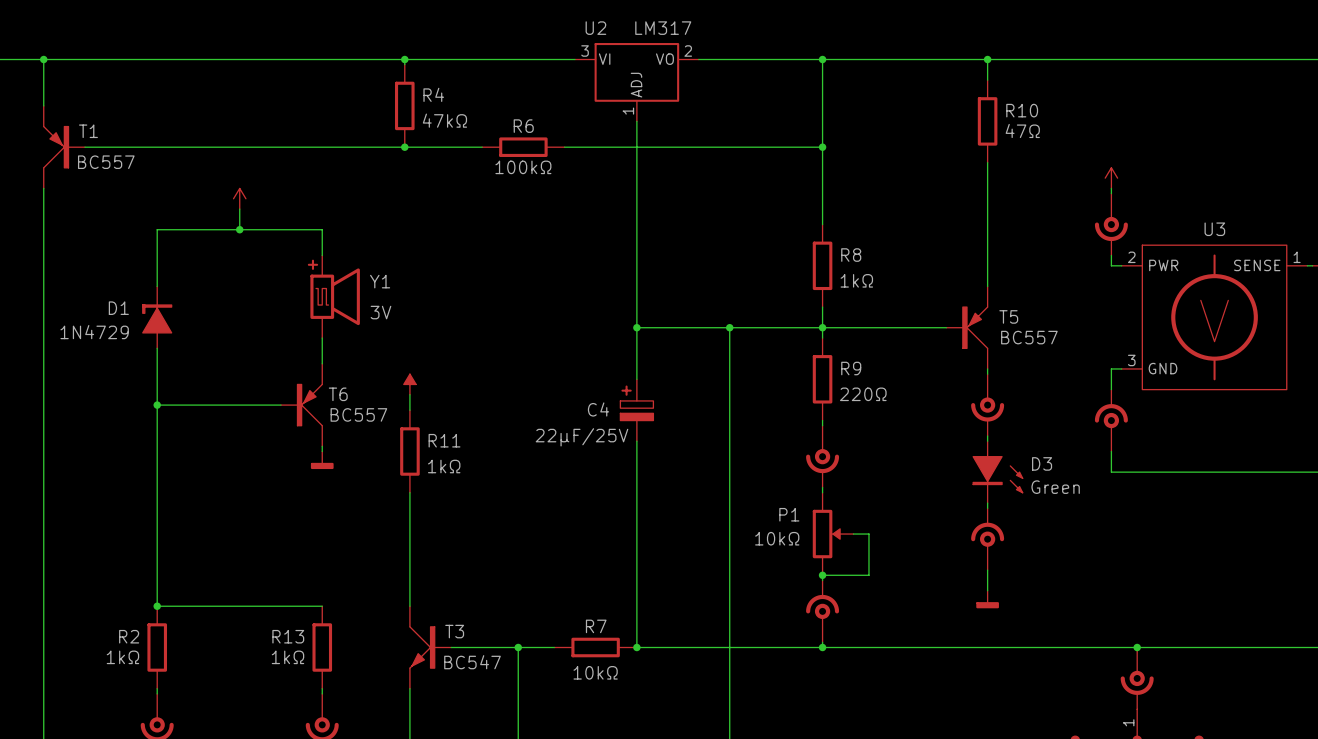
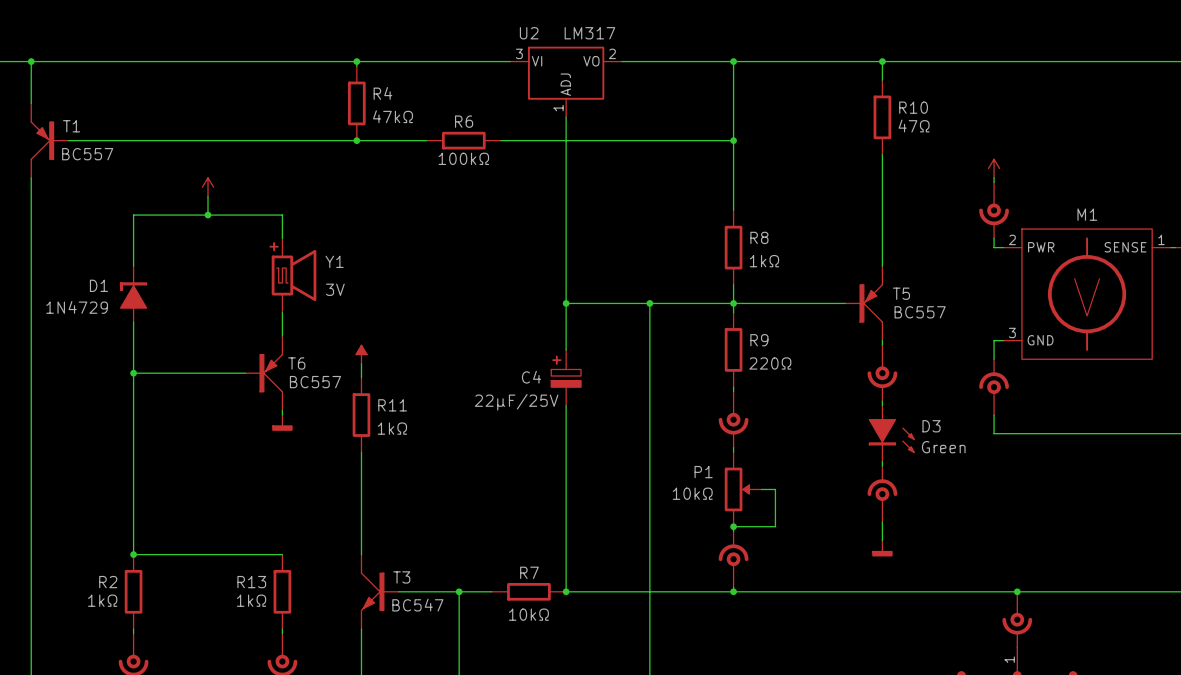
U3 name: U3 (1214, 229) -> M1 (1087, 214)

